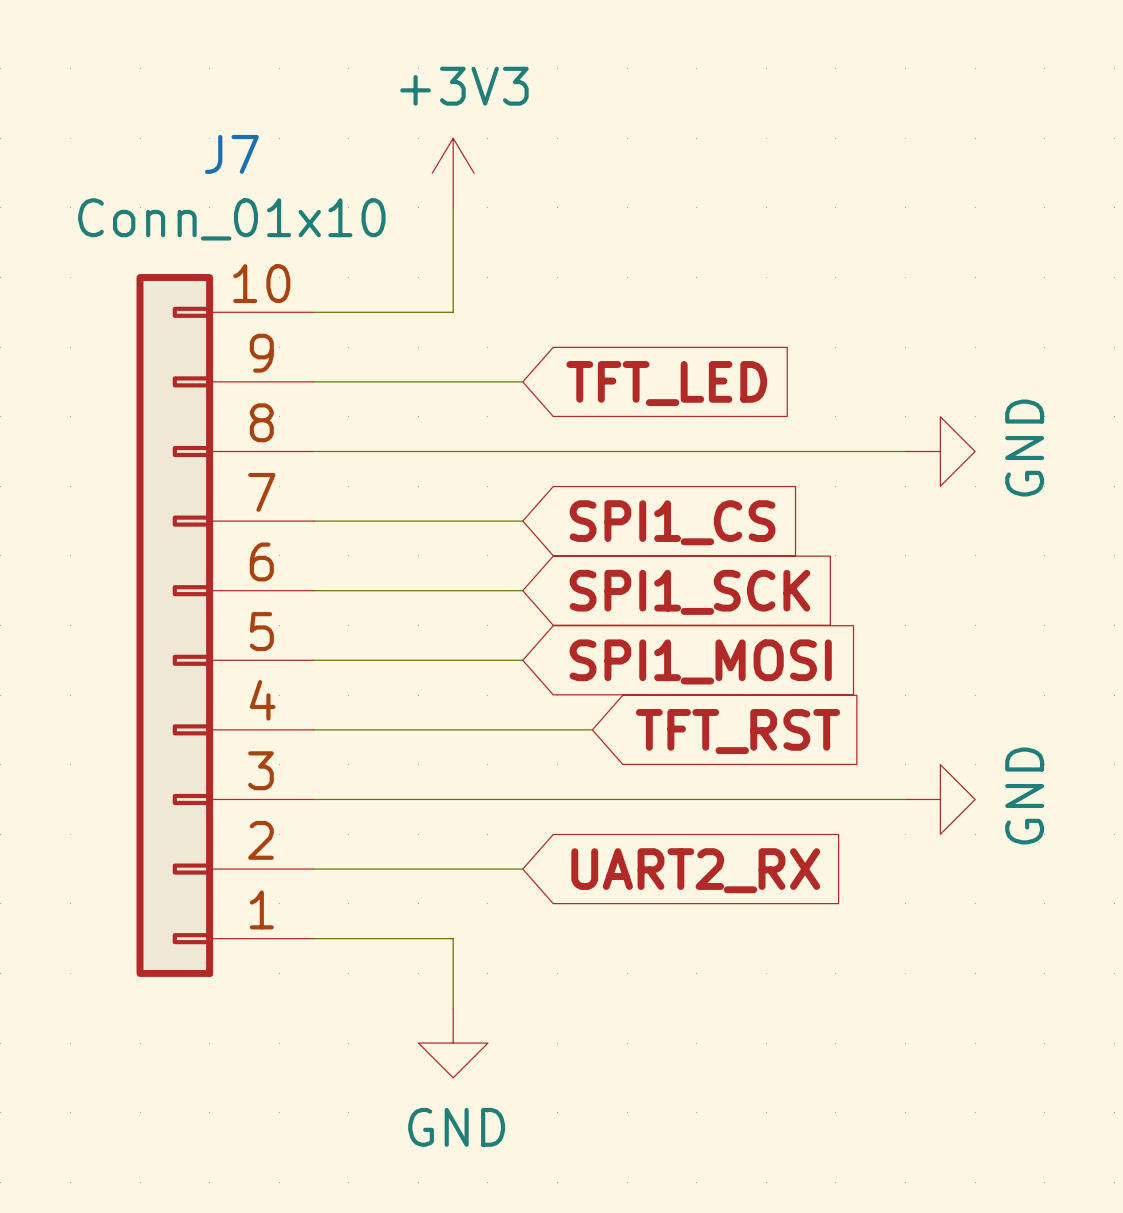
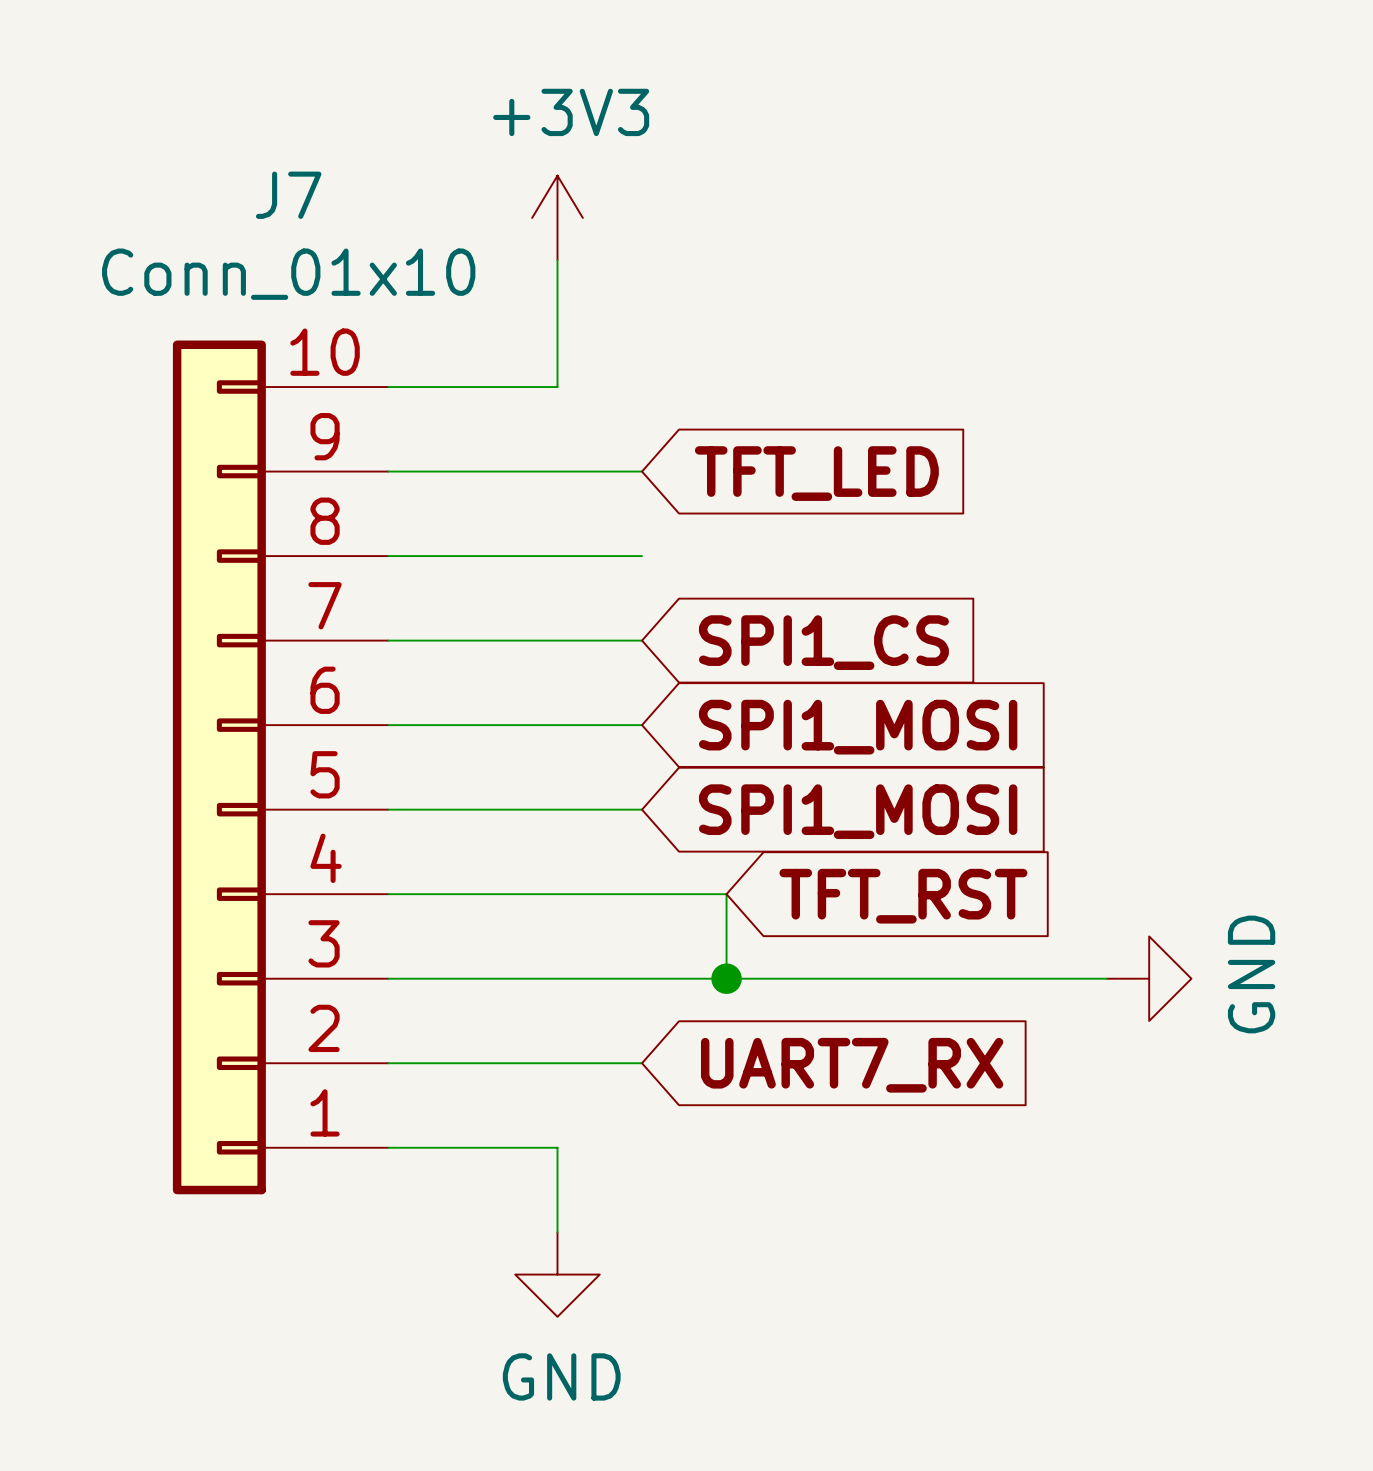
wire: (522, 451) (905, 451) -> none
power symbol: GND (940, 451) -> none
global label: SPI1_SCK (689, 592) -> SPI1_MOSI (858, 727)
wire: none -> (726, 894) (726, 978)
junction: none -> (726, 978)
global label: UART2_RX (695, 870) -> UART7_RX (852, 1065)

